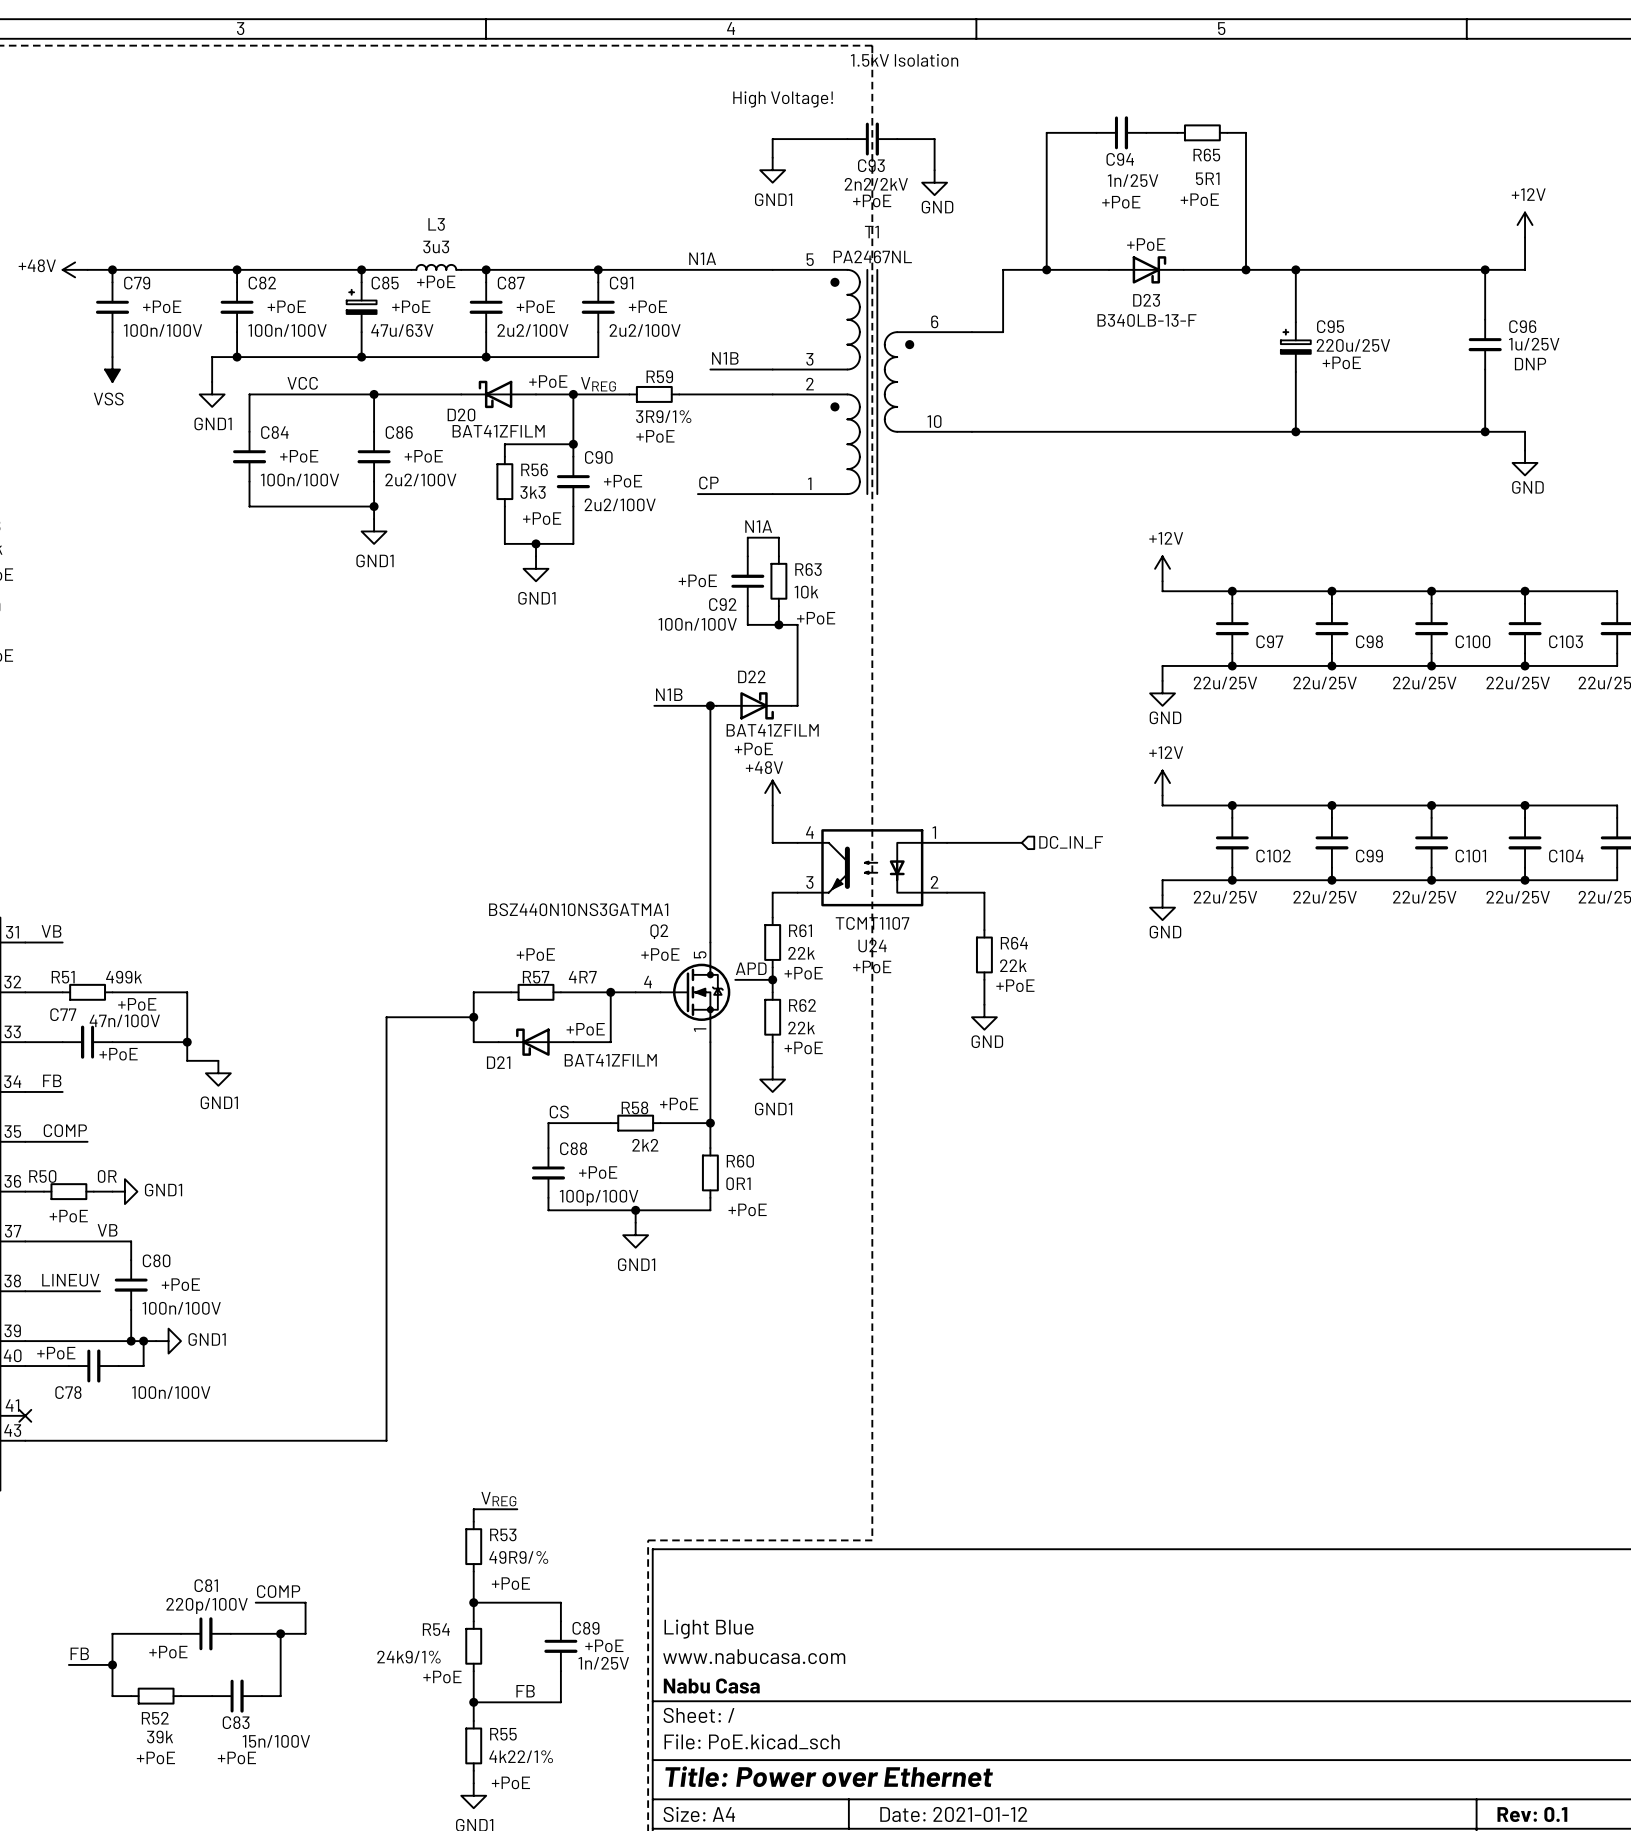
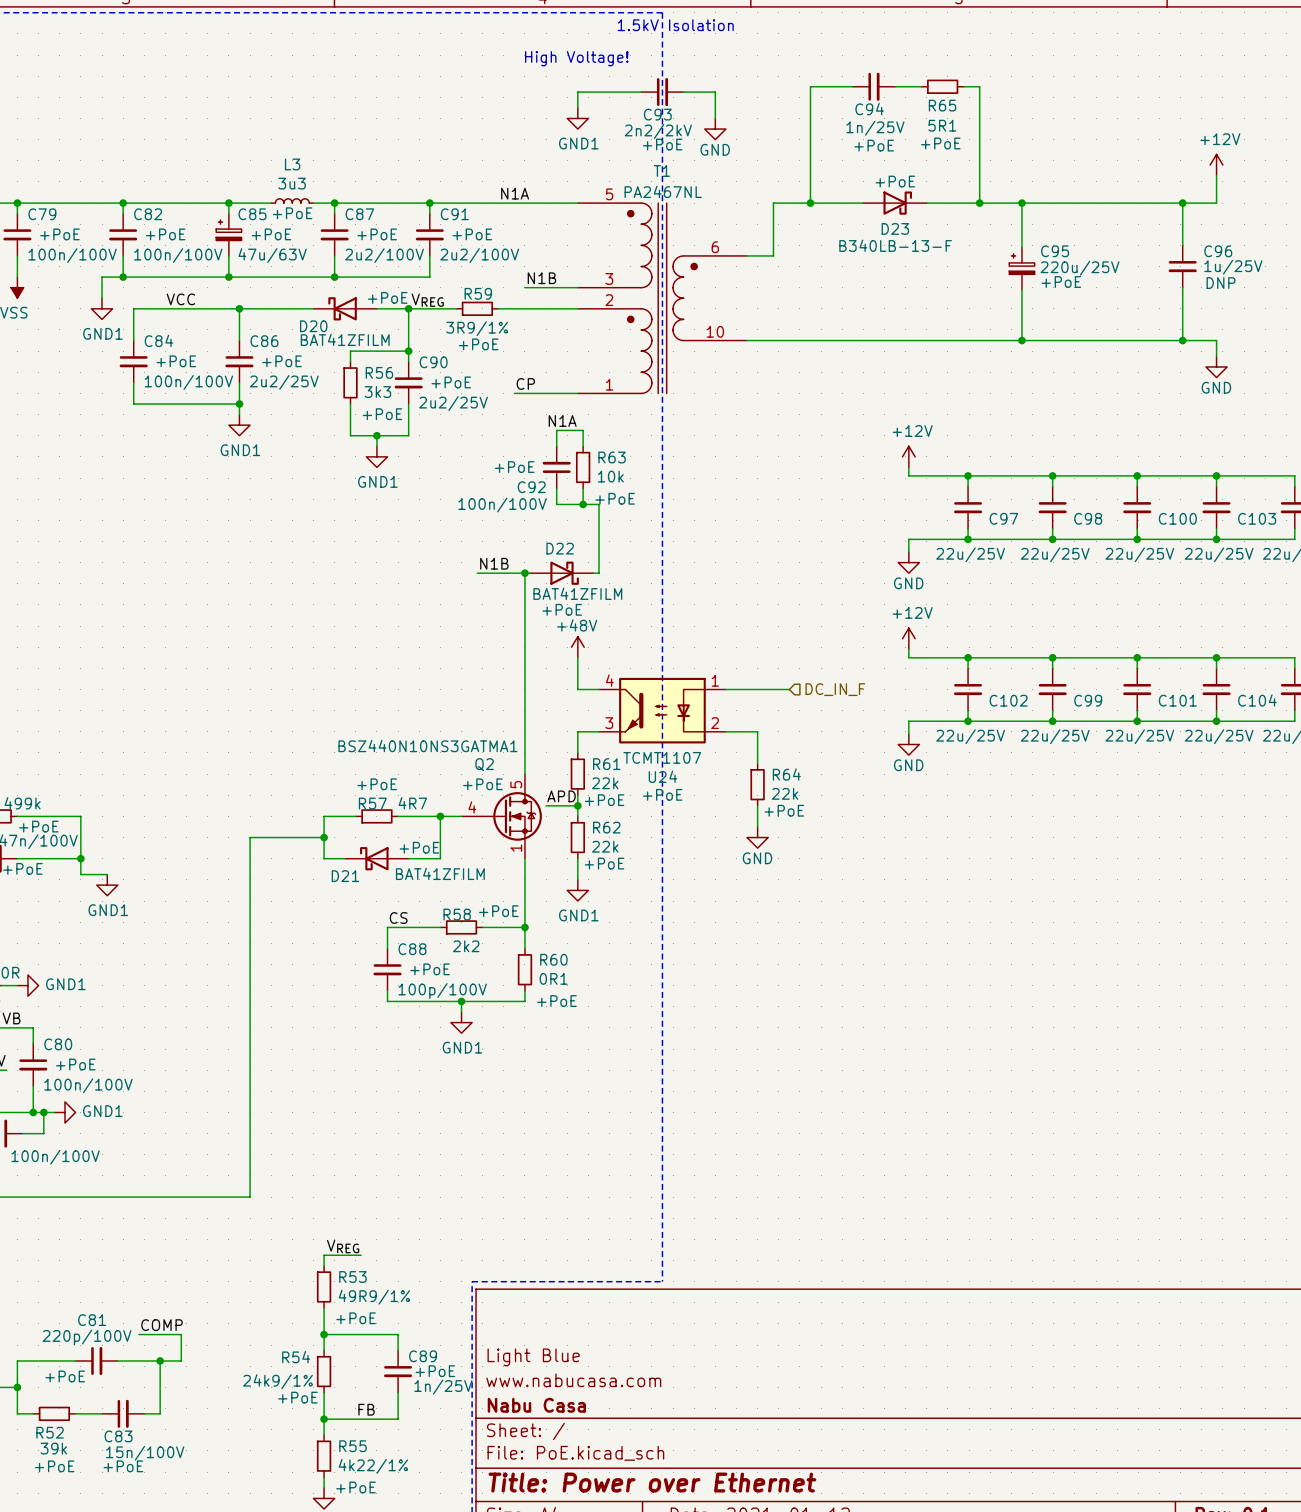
C86 value: 2u2/100V (420, 479) -> 2u2/25V (284, 382)
C90 value: 2u2/100V (620, 504) -> 2u2/25V (453, 403)
R53 value: 49R9/% (518, 1557) -> 49R9/1% (374, 1297)

